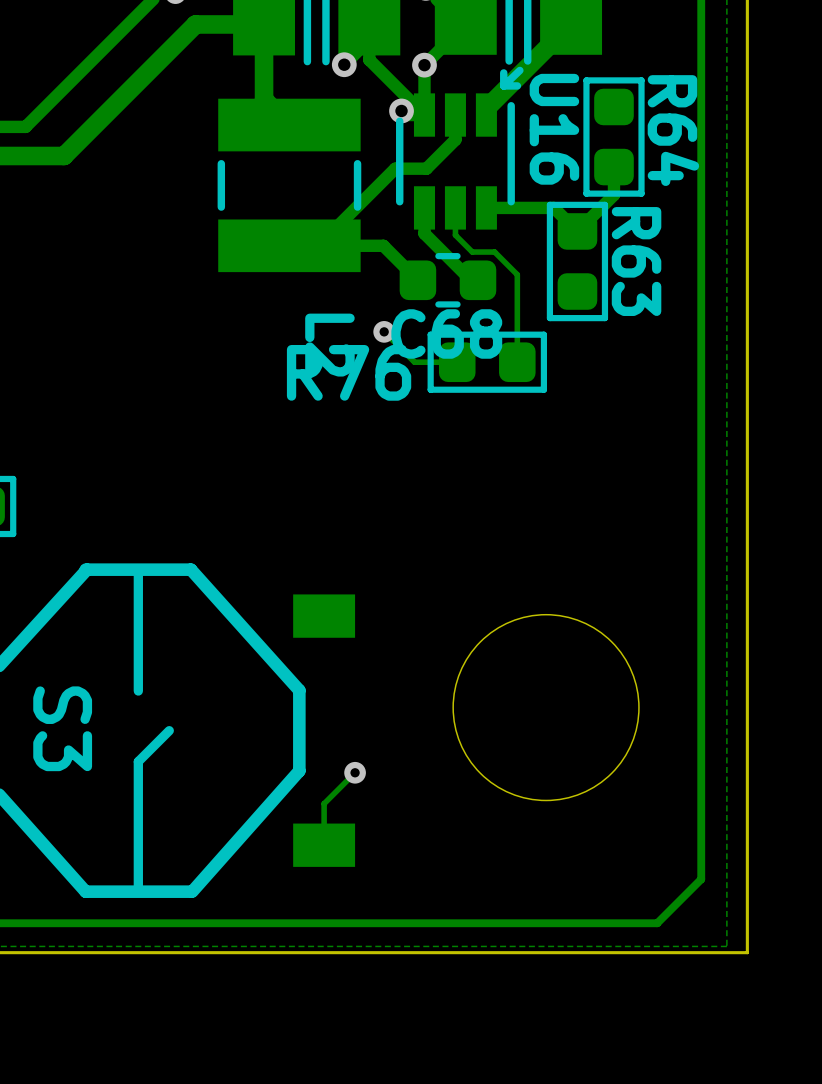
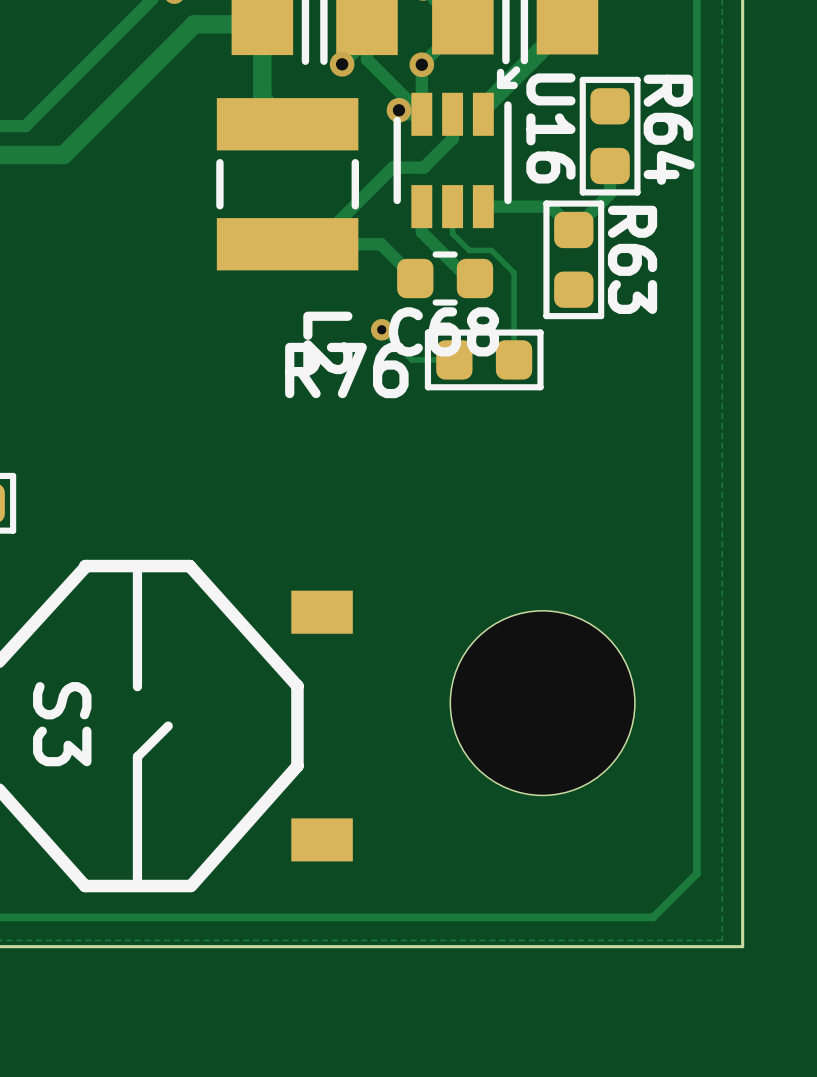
track: (355, 772) (324, 803) (324, 845) -> none
via: (355, 772) -> none

